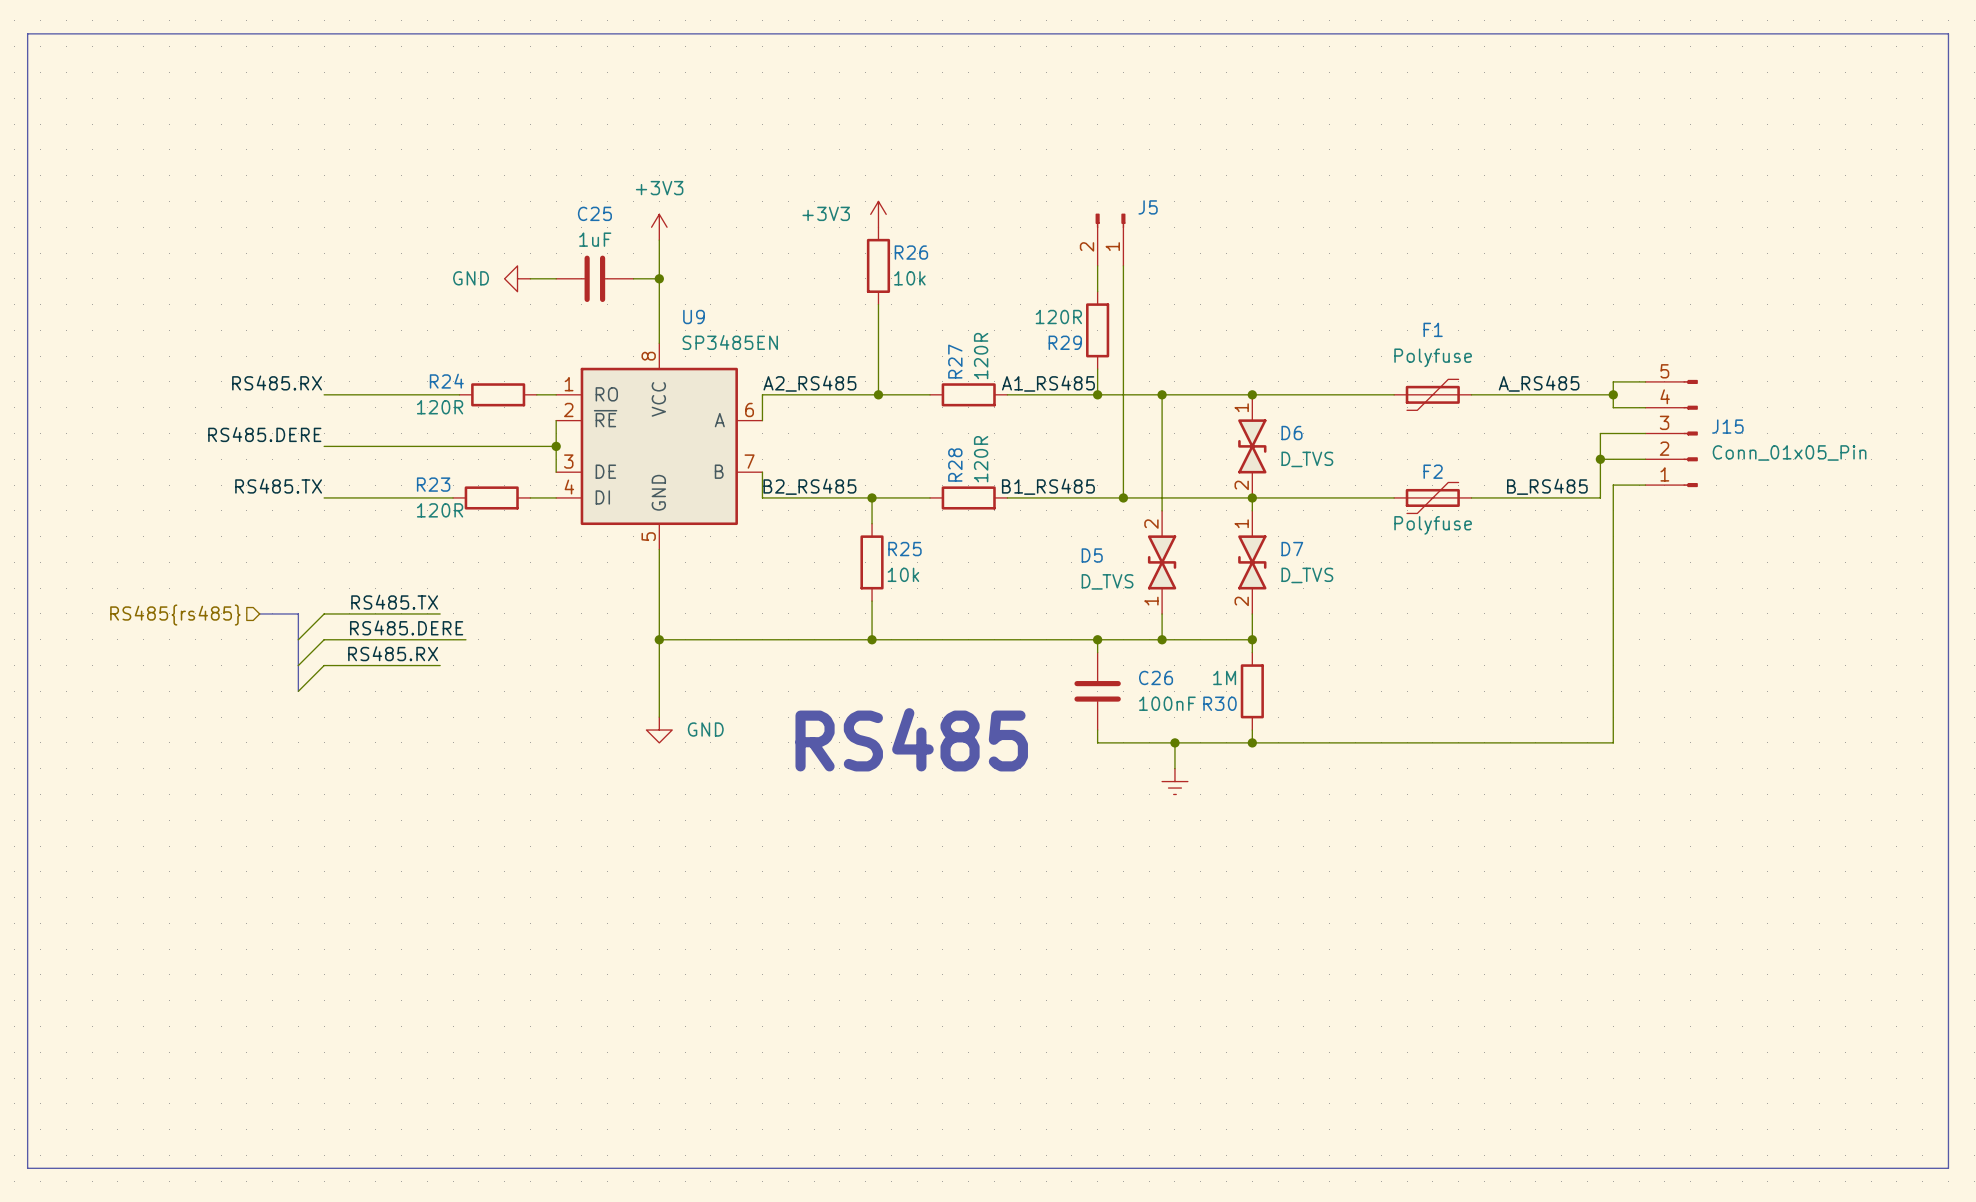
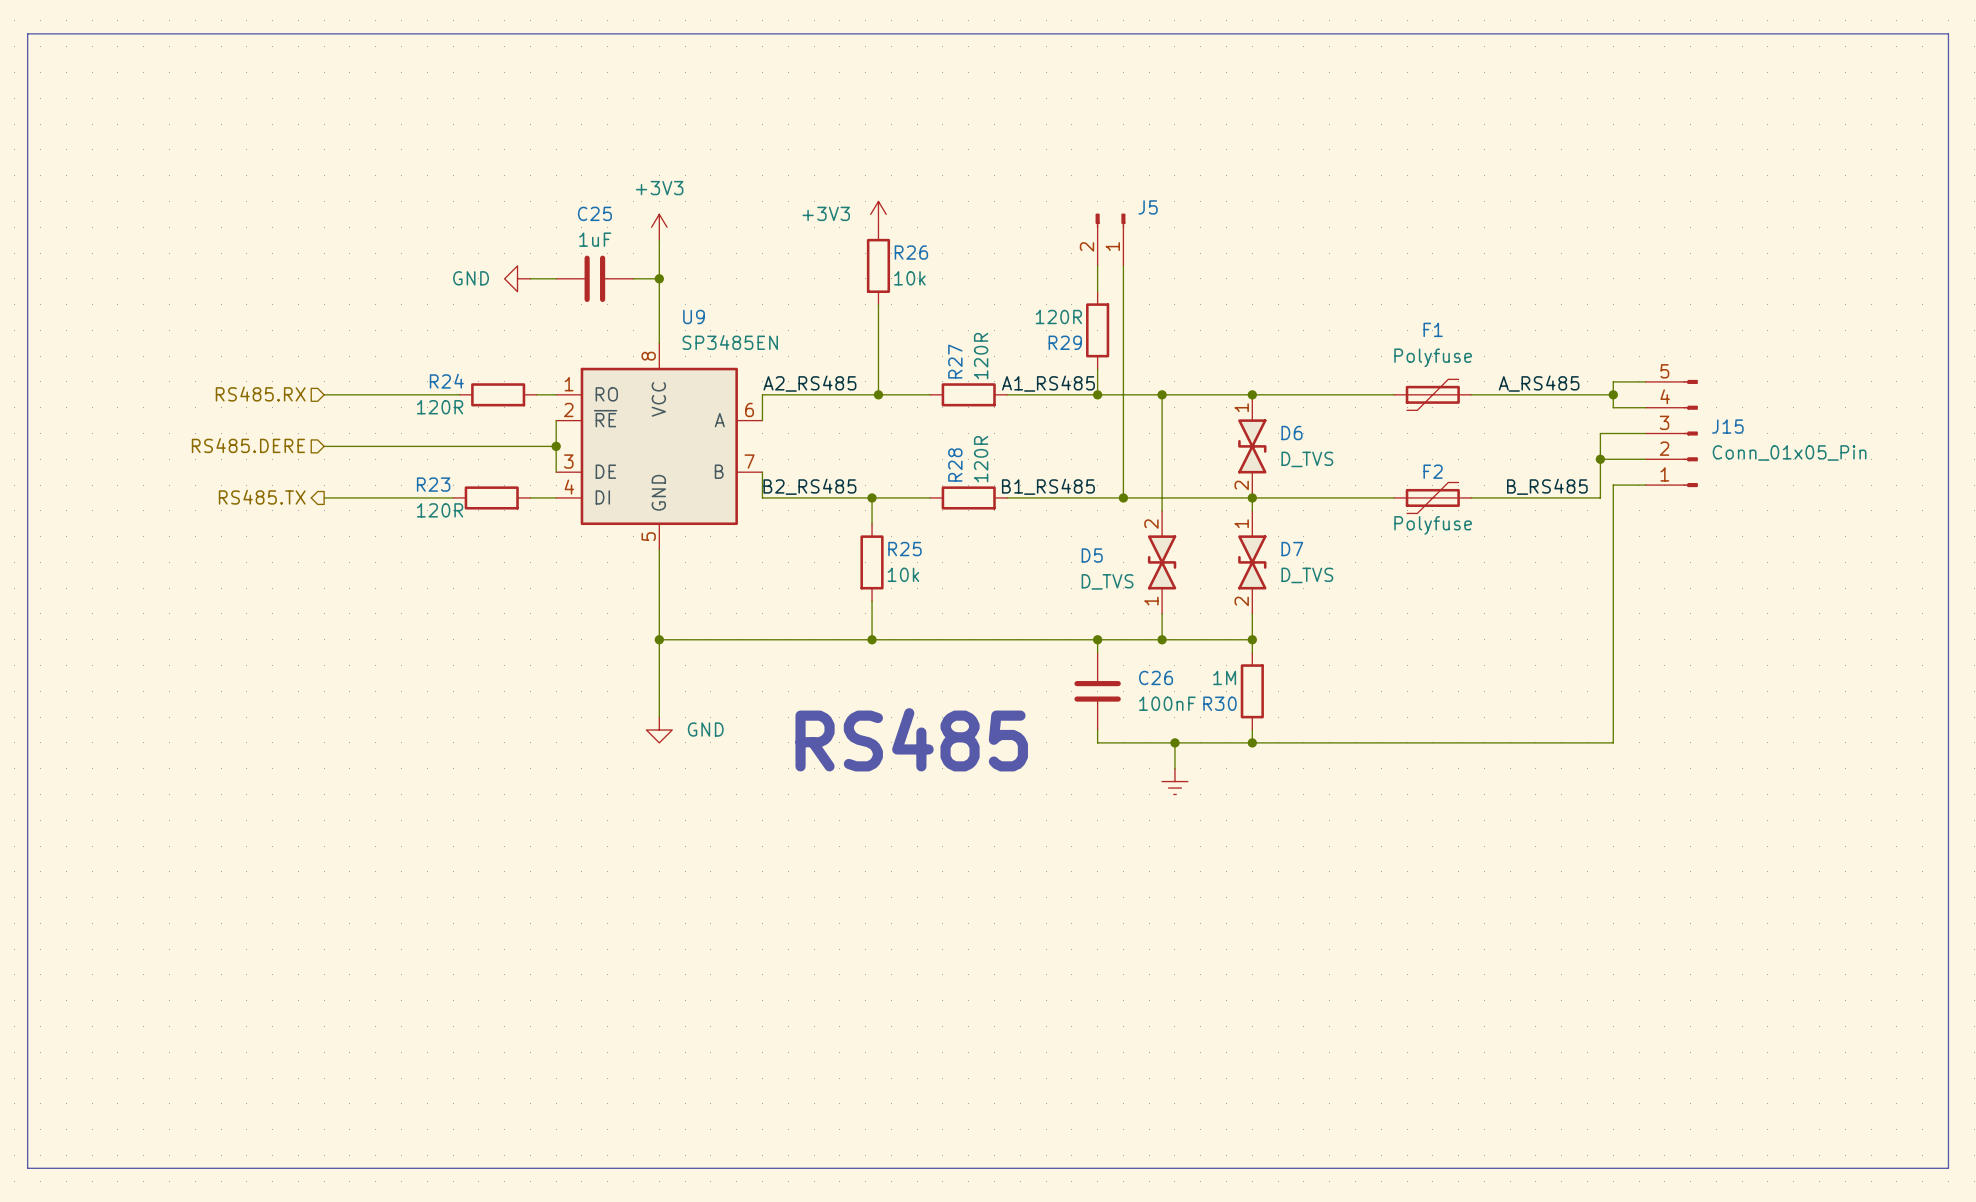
label: RS485.RX (277, 383) -> none
hierarchical label: none -> RS485.RX (260, 394)
label: RS485.DERE (264, 434) -> none
hierarchical label: none -> RS485.DERE (248, 445)
label: RS485.TX (278, 486) -> none
hierarchical label: none -> RS485.TX (262, 497)
label: RS485.TX (394, 602) -> none
bus: (259, 613) (298, 613) (298, 691) -> none
wire: (440, 613) (324, 613) (298, 639) -> none
hierarchical label: RS485{rs485} (175, 615) -> none
label: RS485.DERE (406, 627) -> none
wire: (465, 639) (324, 639) (298, 665) -> none
label: RS485.RX (393, 653) -> none
wire: (440, 665) (324, 665) (298, 691) -> none

